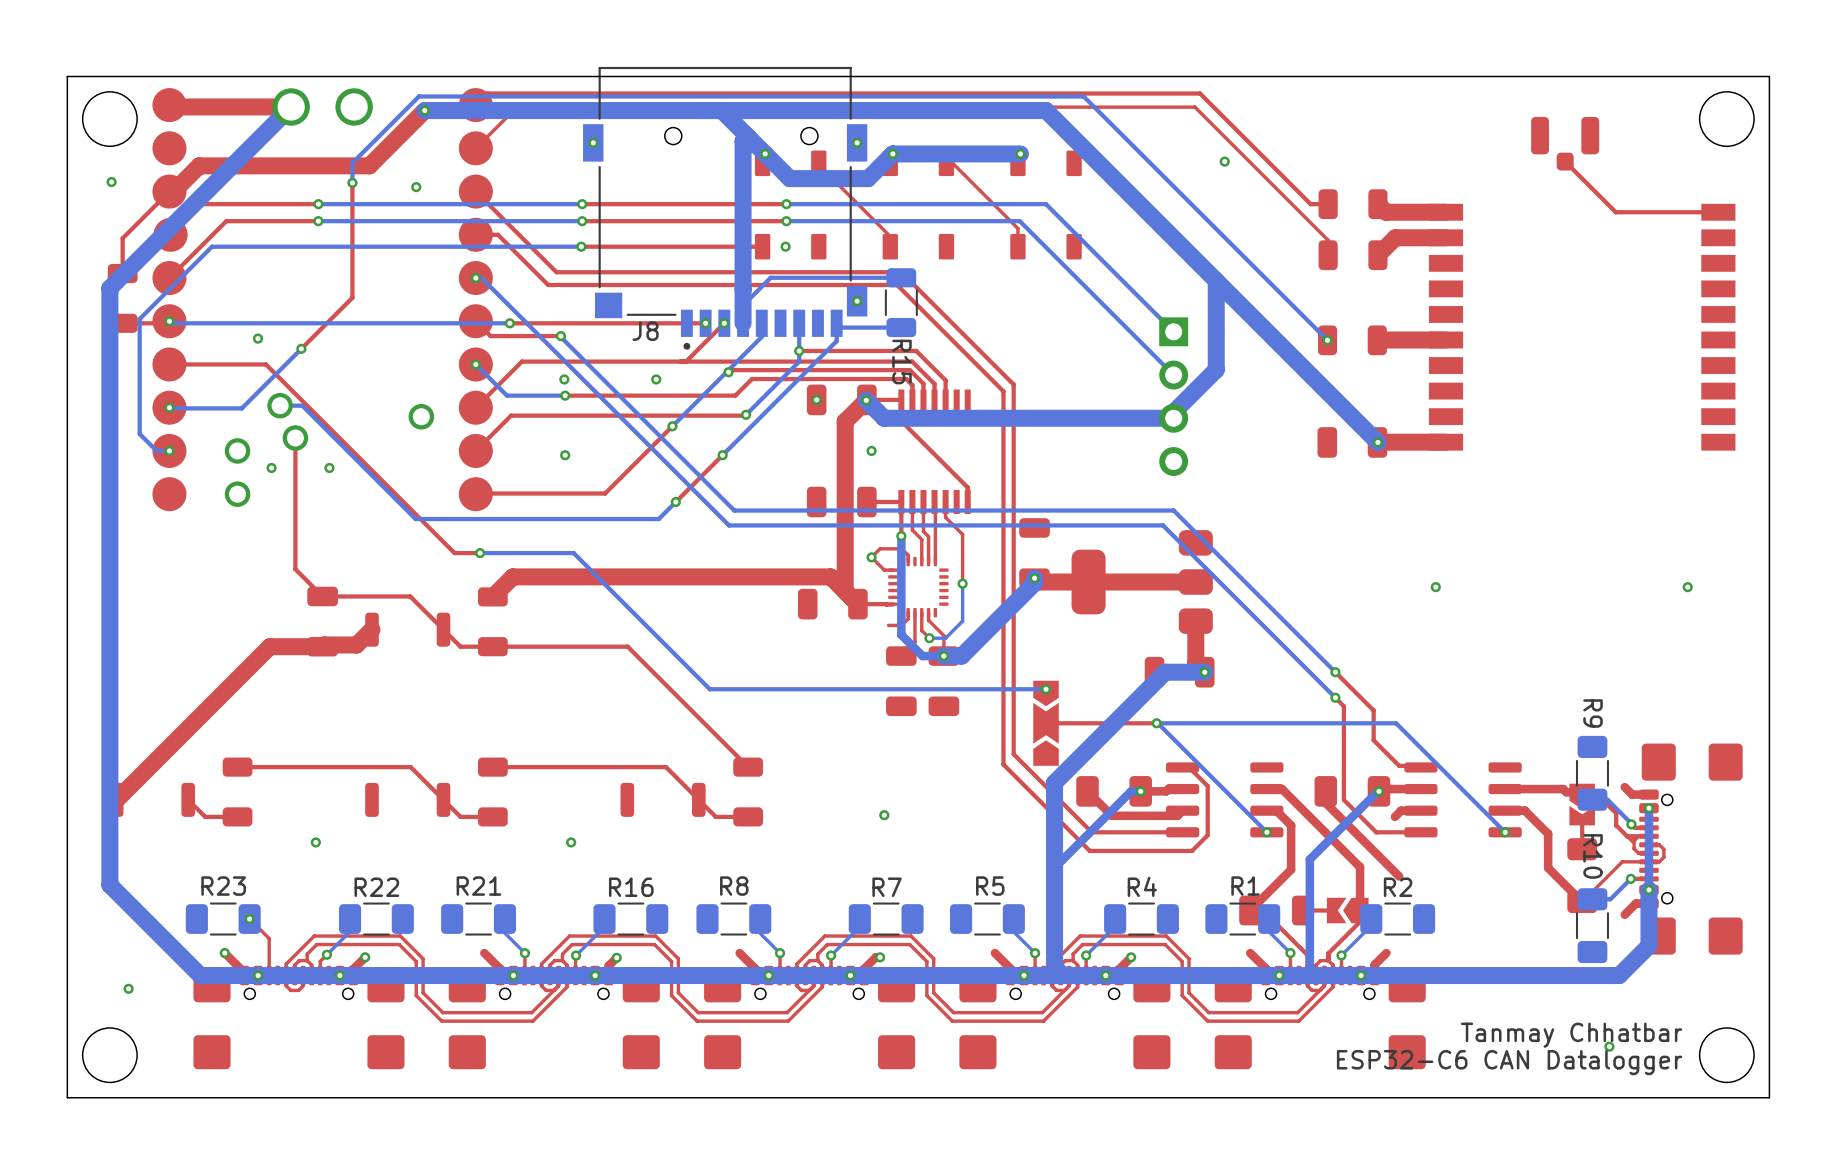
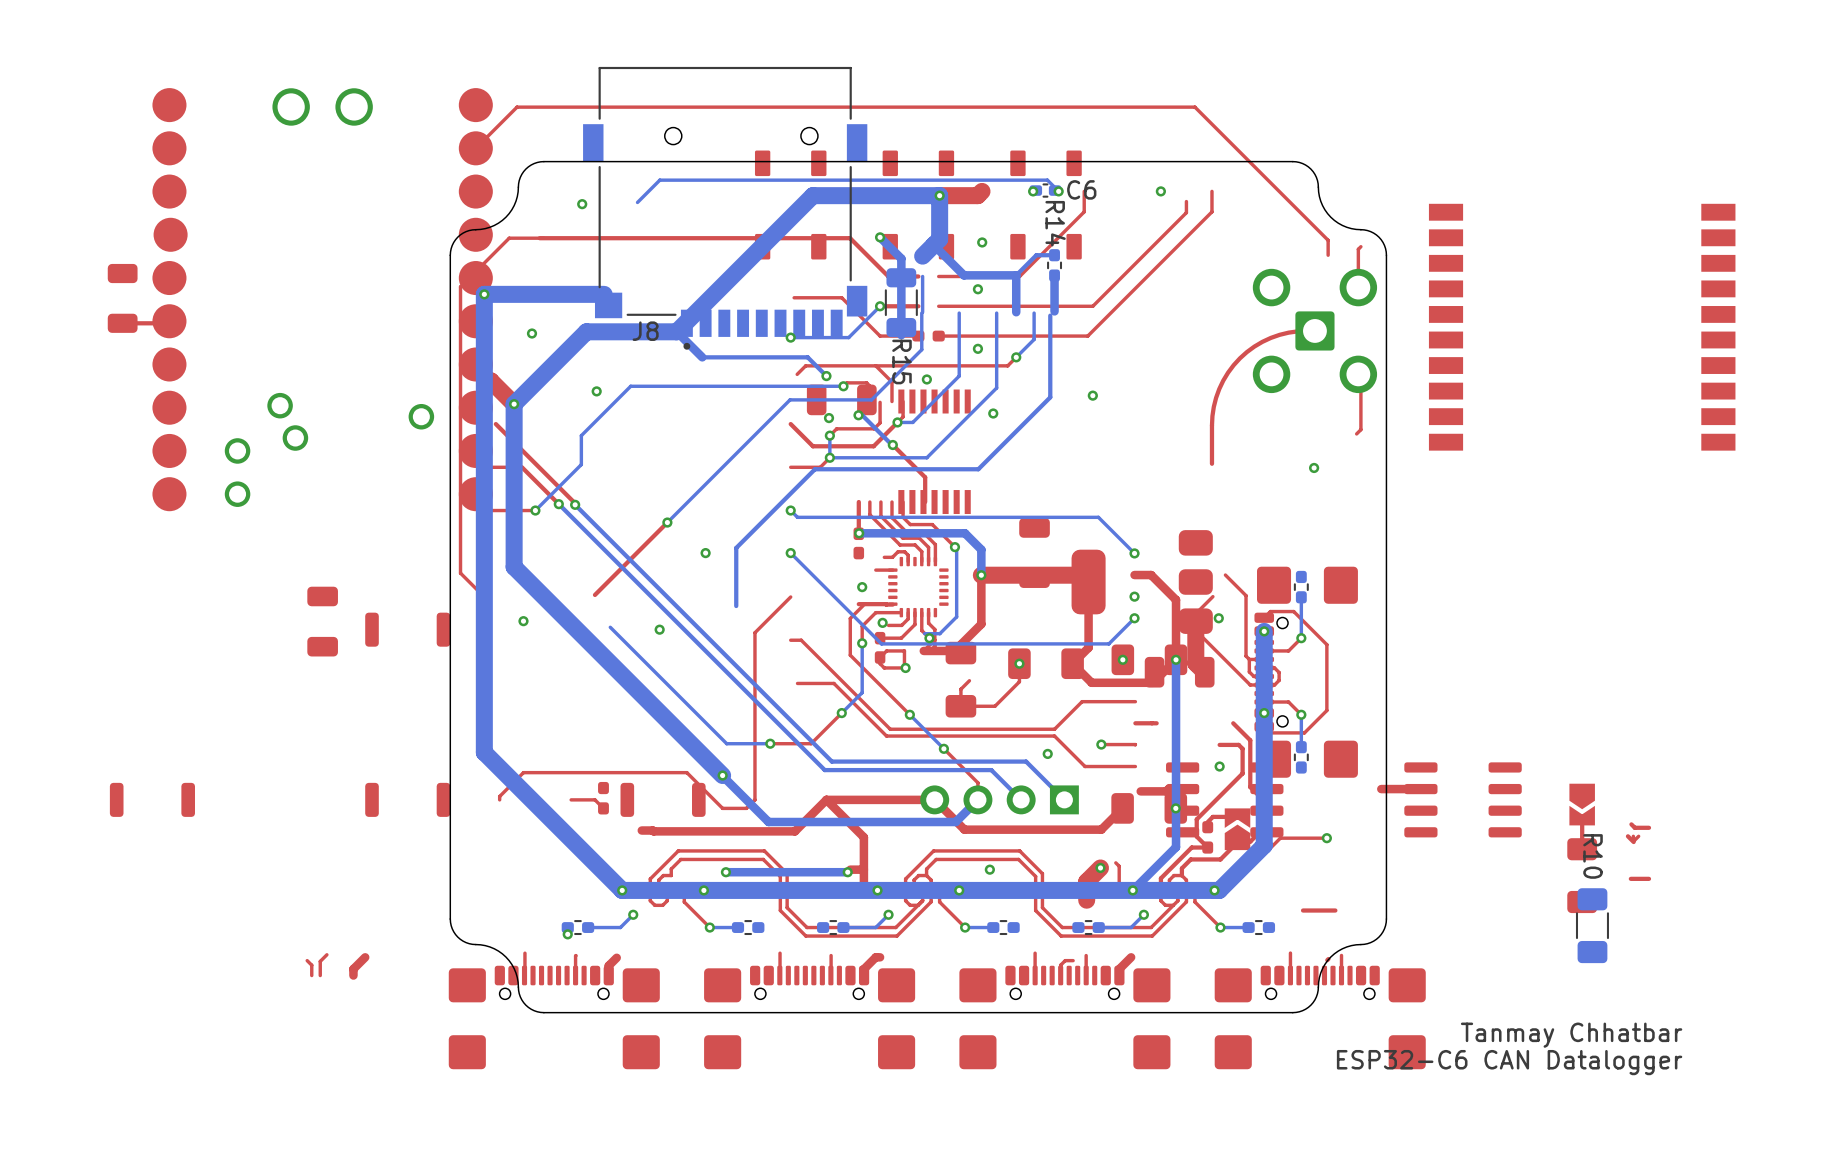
board edge: (1769, 76) (67, 76) (67, 1097) (1769, 1097) (1769, 76) -> none
round board edge: [82, 91, 138, 147] -> none
round board edge: [1699, 91, 1755, 147] -> none
top track: (475, 105) (487, 93) (1200, 93) (1310, 204) (1328, 204) -> none
top track: (291, 106) (171, 106) -> none
bottom track: (291, 106) (109, 288) (109, 884) (200, 975) (1619, 975) (1648, 945) (1648, 808) -> none
top track: (424, 110) (369, 165) (199, 165) (173, 191) -> none
bottom track: (424, 110) (1046, 110) (1377, 442) -> none
via: (424, 110) -> none
bottom track: (721, 110) (789, 178) (868, 178) (892, 153) (1020, 153) -> none
bottom track: (747, 136) (743, 141) (743, 323) (743, 293) -> none
via: (593, 142) -> none
via: (857, 142) -> none
part: (1565, 143) -> none
via: (765, 153) -> none
via: (892, 153) -> none
via: (1020, 153) -> none
via position: (1224, 161) -> (1160, 191)
board edge: none -> (1292, 161) (540, 161) (531, 165) (521, 174) (515, 201) (505, 217) (494, 225) (469, 230) (457, 237) (452, 245) (450, 255) (450, 922) (453, 931) (463, 941) (489, 946) (505, 957) (514, 968) (519, 993) (525, 1005) (534, 1010) (543, 1012) (1296, 1012) (1308, 1007) (1314, 999) (1320, 973) (1330, 957) (1342, 948) (1367, 943) (1378, 937) (1384, 928) (1386, 919) (1386, 251) (1381, 239) (1373, 233) (1346, 227) (1330, 217) (1320, 201) (1317, 180) (1313, 171) (1305, 165) (1292, 161)
top track: (1565, 161) (1615, 212) (1718, 212) -> none
top track: (946, 163) (952, 163) (1017, 228) (1017, 246) -> none
top track: (818, 165) (890, 236) -> none
via: (111, 182) -> none
top track: (352, 182) (352, 297) (301, 348) -> none
bottom track: (352, 182) (352, 163) (418, 96) (1083, 96) (1327, 340) -> none
via: (352, 182) -> none
via: (416, 187) -> none
C6: none -> (1045, 190)
top track: (169, 191) (122, 238) (122, 273) -> none
top track: (475, 191) (556, 272) (901, 272) (1013, 384) (1013, 754) (1091, 832) (1182, 832) -> none
top track: none -> (982, 191) (977, 195) (937, 195)
via: none -> (1033, 191)
bottom track: none -> (1058, 191) (1047, 180) (659, 180) (637, 202)
via: none -> (1058, 191)
top track: none -> (1084, 191) (1084, 211) (1019, 276) (938, 276)
top track: none -> (1211, 191) (1211, 211) (1087, 336) (938, 336)
via: none -> (939, 195)
top track: none -> (1186, 201) (1186, 212) (1092, 306) (938, 306)
top track: (318, 204) (201, 204) (170, 234) -> none
via: (318, 204) -> none
bottom track: (582, 204) (318, 204) -> none
top track: (786, 204) (582, 204) -> none
bottom track: (786, 204) (1046, 204) (1173, 331) -> none
via: (786, 204) -> none
part: (1353, 204) -> none
top track: (1377, 204) (1386, 212) (1446, 212) -> none
top track: (318, 221) (226, 221) (169, 278) -> none
via: (318, 221) -> none
bottom track: (582, 221) (318, 221) -> none
via: (582, 221) -> none
top track: (786, 221) (582, 221) -> none
bottom track: (786, 221) (1019, 221) (1173, 375) -> none
via: (786, 221) -> none
top track: (475, 234) (497, 234) (548, 285) (897, 285) (1003, 391) (1003, 764) (1089, 850) (1192, 850) (1207, 835) (1207, 786) (1189, 767) -> none
bottom track: none -> (880, 237) (901, 258) (901, 335)
via: none -> (880, 237)
top track: (1446, 237) (1395, 237) (1377, 255) -> none
top track: none -> (539, 238) (850, 238) (888, 276) (918, 276)
top track: none -> (543, 238) (509, 238) (460, 286) (460, 573) (484, 596)
via: none -> (982, 242)
bottom track: none -> (933, 245) (964, 275) (1016, 275)
bottom track: (581, 246) (212, 246) (139, 319) (139, 433) (156, 450) (169, 450) -> none
via: (581, 246) -> none
top track: (762, 246) (581, 246) -> none
via: (785, 246) -> none
top track: none -> (1360, 246) (1358, 249) (1358, 287)
bottom track: none -> (1054, 255) (1036, 255) (1016, 275)
part: (1353, 255) -> none
bottom track: none -> (922, 256) (939, 239) (939, 195) (812, 195) (676, 331)
R14: none -> (1054, 265)
bottom track: none -> (1016, 275) (1016, 312)
bottom track: none -> (1054, 275) (1054, 311)
bottom track: none -> (922, 276) (922, 312)
bottom track: (901, 277) (770, 277) (743, 305) -> none
bottom track: (475, 278) (481, 278) (729, 525) (1163, 525) (1335, 697) -> none
via position: (475, 278) -> (484, 294)
bottom track: (1216, 280) (1216, 369) (1173, 412) -> none
via: none -> (977, 289)
bottom track: none -> (604, 294) (484, 294) (484, 752) (622, 890) (1219, 890) (1264, 845) (1264, 631)
top track: none -> (794, 297) (841, 297) (880, 336) (914, 336)
via position: (857, 301) -> (880, 306)
bottom track: none -> (880, 306) (848, 337) (790, 337)
top track: none -> (918, 306) (880, 306)
bottom track: none -> (921, 313) (921, 349) (871, 399) (790, 399) (667, 522)
bottom track: none -> (959, 313) (959, 376) (912, 422) (897, 422)
bottom track: none -> (996, 313) (996, 387) (926, 457) (829, 457) (829, 435)
bottom track: none -> (1034, 313) (1034, 339) (1016, 357)
bottom track: none -> (1050, 315) (1050, 397) (978, 469) (814, 469) (736, 547) (736, 606)
bottom track: (169, 321) (173, 323) (509, 323) -> none
via: (169, 321) -> none
top track: (475, 321) (490, 336) (560, 336) -> none
via: (509, 323) -> none
top track: (705, 323) (509, 323) -> none
via: (705, 323) -> none
top track: (724, 323) (686, 361) -> none
via: (724, 323) -> none
bottom track: (761, 323) (761, 336) (728, 372) (672, 426) -> none
bottom track: (799, 323) (799, 361) (746, 414) -> none
bottom track: (901, 327) (840, 327) (836, 323) (836, 341) (722, 455) -> none
top track: none -> (1307, 330) (1288, 332) (1262, 341) (1239, 358) (1228, 372) (1219, 389) (1213, 406) (1211, 463)
part: none -> (1314, 330)
bottom track: none -> (676, 331) (702, 357) (807, 357) (826, 376)
bottom track: none -> (676, 331) (586, 331) (514, 404) (514, 567) (768, 822) (955, 822) (977, 799)
via: none -> (532, 333)
bottom track: (560, 336) (734, 510) (1173, 510) (1335, 672) -> none
via: (560, 336) -> none
part: none -> (928, 336)
via: (257, 338) -> none
top track: (1446, 339) (1377, 339) -> none
via: (1327, 340) -> none
part: (1352, 340) -> none
bottom track: (301, 348) (241, 408) (169, 407) -> none
via: (301, 348) -> none
via: none -> (977, 348)
top track: (799, 350) (916, 350) (945, 380) (945, 401) -> none
via position: (799, 350) -> (790, 337)
top track: none -> (1016, 357) (1007, 365) (805, 365) (797, 374)
via: none -> (1016, 357)
top track: (169, 364) (265, 364) (454, 553) (480, 553) -> none
bottom track: (475, 364) (506, 395) (565, 395) -> none
via: (475, 364) -> none
top track: none -> (875, 365) (891, 382) (891, 401)
top track: (728, 372) (730, 370) (909, 370) (923, 383) (923, 401) -> none
via: (728, 372) -> none
top track: none -> (1358, 374) (1360, 374) (1360, 429) (1356, 433)
via: none -> (826, 376)
via: (564, 379) -> none
via: (656, 379) -> none
via: none -> (926, 379)
top track: none -> (484, 380) (490, 380) (514, 404)
top track: none -> (843, 386) (846, 382) (866, 382) (869, 386) (869, 401)
bottom track: none -> (843, 386) (630, 386) (581, 435) (581, 464) (535, 510)
via: none -> (843, 386)
via: none -> (596, 391)
top track: (565, 395) (735, 395) (751, 379) (906, 379) (912, 385) (912, 401) -> none
via: (565, 395) -> none
via: none -> (1092, 395)
part: (1173, 396) -> none
via: (816, 399) -> none
bottom track: (866, 400) (884, 418) (1173, 418) -> none
via: (866, 400) -> none
top track: none -> (903, 401) (903, 416) (873, 446) (812, 446) (790, 424)
top track: (934, 401) (934, 383) (912, 361) (521, 361) (475, 407) -> none
top track: none -> (880, 402) (880, 422) (874, 428) (836, 428) (829, 435)
via: none -> (514, 404)
bottom track: (280, 405) (302, 405) (415, 519) (658, 519) (675, 502) -> none
via: (169, 407) -> none
via: none -> (993, 413)
top track: (746, 414) (511, 415) (475, 450) -> none
via: (746, 414) -> none
bottom track: none -> (858, 415) (862, 415) (892, 445)
via: none -> (858, 415)
via: none -> (829, 418)
via: none -> (897, 422)
top track: none -> (495, 424) (575, 503)
top track: (672, 426) (605, 493) (476, 493) -> none
via: (672, 426) -> none
via: none -> (829, 435)
top track: (295, 438) (295, 569) (322, 596) (410, 596) (460, 646) (627, 646) (748, 767) -> none
part: (1352, 442) -> none
via: (1377, 442) -> none
top track: (1446, 442) (1377, 442) -> none
top track: none -> (892, 445) (925, 477) (925, 502)
via: none -> (892, 445)
via: (169, 450) -> none
via: (871, 450) -> none
via: (565, 455) -> none
top track: (722, 455) (675, 502) -> none
via: (722, 455) -> none
top track: none -> (829, 457) (820, 467) (790, 467)
via: none -> (829, 457)
via: (271, 467) -> none
via: (329, 467) -> none
top track: none -> (484, 467) (521, 467) (558, 504)
via: none -> (1314, 467)
via position: (675, 502) -> (667, 522)
part: (841, 502) -> none
top track: none -> (858, 502) (858, 533)
top track: (866, 502) (901, 502) (901, 536) -> none
top track: none -> (903, 502) (903, 517) (910, 524) (932, 524) (954, 547)
top track: (912, 502) (912, 530) (921, 539) (921, 551) -> (869, 502) (869, 514) (900, 544) (915, 544) (921, 551)
top track: (923, 502) (923, 531) (928, 536) (928, 547) -> (880, 502) (880, 516) (902, 538) (919, 538) (928, 547)
top track: (935, 502) (935, 544) -> (891, 502) (891, 517) (905, 531) (922, 531) (935, 544)
top track: (945, 502) (945, 517) (962, 534) (962, 583) -> none
top track: (967, 502) (967, 487) (901, 421) (901, 401) (899, 399) (866, 399) (845, 421) (845, 591) -> none
bottom track: none -> (558, 504) (824, 770) (991, 770) (1021, 799)
via: none -> (558, 504)
bottom track: none -> (575, 504) (831, 761) (1026, 761) (1064, 799)
via: none -> (575, 504)
top track: none -> (535, 510) (484, 510)
via: none -> (535, 510)
bottom track: none -> (790, 510) (797, 517) (1098, 517) (1134, 553)
via: none -> (790, 510)
top track: none -> (667, 522) (594, 594)
bottom track: none -> (859, 533) (964, 533) (981, 549) (981, 575)
via: none -> (859, 533)
bottom track: (901, 536) (901, 634) (922, 656) (961, 656) (1034, 583) (1034, 578) -> none
via: (901, 536) -> none
part: none -> (858, 543)
bottom track: none -> (954, 547) (956, 548) (956, 616) (939, 633) (924, 633)
via: none -> (954, 547)
top track: (904, 551) (901, 548) (880, 548) (871, 557) (884, 570) -> (904, 551) (898, 551) (892, 557) (884, 557)
bottom track: (480, 553) (573, 553) (709, 689) (1046, 689) -> none
via: (480, 553) -> none
via: none -> (705, 553)
bottom track: none -> (790, 553) (881, 643) (1108, 643) (1134, 618)
via: none -> (790, 553)
via: none -> (1134, 553)
via: (871, 557) -> none
top track: none -> (884, 570) (875, 570)
via: none -> (981, 575)
top track: none -> (1088, 575) (981, 575) (981, 624) (960, 644) (960, 653) (958, 650) (923, 650) (934, 639)
top track: none -> (1134, 575) (1151, 575) (1176, 599) (1176, 659) (1153, 682) (1091, 682) (1072, 663) (1088, 647) (1088, 614)
top track: none -> (1225, 575) (1246, 595) (1246, 656) (1249, 659) (1264, 659)
top track: (1034, 578) (1038, 582) (1195, 582) -> none
via: (1034, 578) -> none
bottom track: (962, 583) (962, 621) (945, 638) (929, 638) -> none
via: (962, 583) -> none
via: none -> (862, 587)
part: none -> (1301, 587)
via: (1435, 587) -> none
via: (1687, 587) -> none
top track: (492, 596) (512, 576) (830, 576) (857, 604) -> none
top track: none -> (790, 596) (754, 632) (754, 799) (746, 808) (722, 808) (686, 772) (523, 772) (499, 796) (499, 799)
via: none -> (1134, 596)
top track: none -> (1212, 596) (1197, 612) (1197, 631) (1250, 684) (1274, 684) (1279, 680) (1279, 672) (1274, 667) (1264, 667)
bottom track: none -> (1301, 597) (1301, 638)
part: (832, 604) -> none
top track: none -> (863, 605) (850, 618) (850, 655) (909, 714)
top track: none -> (901, 612) (875, 612) (862, 626) (862, 643)
top track: none -> (1264, 617) (1270, 611) (1293, 611) (1326, 644) (1326, 710) (1304, 732) (1270, 732) (1264, 726)
via: none -> (1134, 618)
via: none -> (1218, 618)
top track: (928, 620) (943, 635) (943, 656) -> (928, 620) (928, 623) (934, 629) (934, 646) (931, 649)
part: (492, 621) -> none
via: none -> (523, 621)
via: none -> (882, 622)
top track: (914, 624) (914, 642) (901, 656) -> (914, 624) (901, 638) (880, 638)
bottom track: none -> (610, 627) (726, 743) (770, 743)
top track: (372, 629) (356, 644) (269, 646) (116, 799) -> none
via: none -> (659, 629)
via: none -> (1264, 631)
top track: none -> (1301, 638) (1288, 650) (1264, 650)
via: none -> (1301, 638)
top track: none -> (790, 640) (801, 640) (890, 729) (1054, 729) (1082, 701) (1135, 701)
bottom track: none -> (862, 643) (862, 692) (841, 713)
via: none -> (862, 643)
part: none -> (880, 647)
top track: none -> (904, 650) (886, 650) (880, 657) (880, 663) (884, 667) (905, 667) (904, 650)
via: (943, 656) -> none
via: none -> (1122, 659)
part: none -> (1149, 659)
bottom track: none -> (1176, 659) (1176, 847) (1132, 890)
via: none -> (1176, 659)
top track: none -> (1249, 659) (1249, 671) (1253, 676) (1264, 676)
top track: none -> (1019, 663) (1019, 681) (994, 706) (960, 706) (960, 689) (969, 680)
via: none -> (1019, 663)
part: none -> (1046, 663)
via: none -> (905, 667)
bottom track: (1204, 672) (1165, 672) (1054, 782) (1054, 967) (1063, 975) -> none
via: (1204, 672) -> none
top track: (1335, 672) (1373, 710) (1373, 740) (1399, 765) (1419, 765) -> none
via: (1335, 672) -> none
part: none -> (960, 679)
part: (901, 681) -> none
part: (943, 681) -> none
top track: none -> (797, 683) (833, 683) (886, 736) (1054, 736) (1085, 766) (1135, 766)
via: (1046, 689) -> none
top track: (1335, 697) (1343, 706) (1343, 799) (1376, 832) (1420, 832) -> none
via: (1335, 697) -> none
top track: none -> (1264, 702) (1288, 702) (1301, 714)
top track: none -> (841, 713) (811, 743) (770, 743)
via: none -> (841, 713)
via: none -> (1264, 713)
bottom track: none -> (909, 714) (943, 748)
via: none -> (909, 714)
bottom track: none -> (1301, 714) (1301, 747)
via: none -> (1301, 714)
part: (1046, 723) -> none
top track: (1135, 723) (1046, 723) -> none
bottom track: (1156, 723) (1396, 723) (1505, 832) -> none
via: (1156, 723) -> none
bottom track: (1157, 723) (1266, 832) -> none
top track: none -> (1233, 723) (1250, 740) (1250, 787) (1258, 795) (1258, 833) (1250, 841) (1237, 841)
via: none -> (770, 743)
via: none -> (1101, 744)
top track: none -> (1135, 744) (1101, 744)
top track: none -> (1219, 744) (1238, 744) (1242, 748) (1242, 773) (1196, 819) (1196, 836) (1207, 847) (1191, 847) (1160, 878) (1160, 900) (1165, 905) (1173, 905)
top track: none -> (943, 748) (977, 782) (977, 799)
via: none -> (943, 748)
via: none -> (1047, 753)
part: none -> (1301, 757)
via: none -> (1219, 766)
top track: (237, 767) (410, 767) (460, 816) (492, 816) -> none
top track: (492, 767) (666, 767) (715, 816) (748, 816) -> none
R9: (1592, 773) -> none
via: none -> (722, 775)
top track: (1624, 787) (1632, 794) (1648, 794) -> none
top track: (1266, 789) (1282, 789) (1360, 867) (1360, 921) (1328, 953) (1328, 960) -> none
top track: (1505, 789) (1563, 789) (1566, 792) (1595, 792) (1616, 813) (1616, 825) (1627, 836) (1648, 836) -> none
top track: (1087, 791) (1111, 815) (1177, 815) (1182, 810) -> none
part position: (1114, 791) -> (1149, 808)
bottom track: (1140, 791) (1131, 791) (1055, 866) -> none
via: (1140, 791) -> none
top track: (1325, 791) (1325, 803) (1399, 876) -> none
part: (1352, 791) -> none
bottom track: (1378, 791) (1309, 859) (1309, 975) -> none
via: (1378, 791) -> none
part: (237, 792) -> none
part: (492, 792) -> none
part: (748, 792) -> none
part: none -> (603, 798)
top track: (188, 799) (205, 816) (237, 816) -> none
top track: none -> (571, 799) (594, 799) (603, 808)
top track: none -> (826, 799) (794, 831) (641, 830)
top track: none -> (826, 799) (934, 799) (964, 829) (1101, 829) (1122, 808)
top track: none -> (826, 799) (863, 837) (863, 890)
part: none -> (999, 799)
bottom track: (1592, 799) (1607, 799) (1631, 824) -> none
via: none -> (1175, 808)
via: (1648, 808) -> none
top track: (1276, 810) (1291, 825) (1291, 869) (1250, 910) (1262, 910) (1307, 955) (1307, 985) (1312, 990) (1319, 990) -> none
top track: (1420, 810) (1401, 810) (1394, 816) -> none
top track: (1505, 810) (1524, 810) (1548, 833) (1548, 867) (1582, 902) (1622, 861) (1659, 861) (1663, 857) (1663, 849) (1659, 844) (1648, 844) -> none
via: (884, 815) -> none
top track: none -> (1237, 816) (1212, 816) (1207, 822)
via: (1631, 824) -> none
via: (1266, 832) -> none
via: (1505, 832) -> none
part: none -> (1207, 837)
top track: none -> (1326, 838) (1280, 838) (1228, 890)
via: none -> (1326, 838)
top track: (1634, 840) (1634, 848) (1638, 853) (1648, 853) -> none
via: (315, 842) -> none
via: (571, 842) -> none
top track: none -> (1237, 842) (1220, 859) (1190, 859) (1181, 868) (1181, 875)
part position: (1690, 849) -> (1306, 672)
top track: none -> (1115, 862) (1119, 866) (1119, 890)
top track: none -> (1100, 867) (1086, 881) (1086, 900)
via: none -> (1100, 867)
top track: none -> (863, 869) (850, 869)
via: none -> (989, 869)
via: none -> (725, 872)
bottom track: none -> (847, 872) (725, 872)
via: none -> (847, 872)
bottom track: (1630, 878) (1610, 899) (1592, 899) -> none
via: (1630, 878) -> none
via: (1648, 889) -> none
via: none -> (622, 890)
top track: none -> (684, 890) (684, 902) (709, 927)
via: none -> (703, 890)
via: none -> (877, 890)
top track: none -> (939, 890) (939, 902) (965, 927)
via: none -> (959, 890)
via: none -> (1132, 890)
top track: none -> (1194, 890) (1194, 902) (1220, 927)
via: none -> (1214, 890)
top track: (1648, 903) (1635, 903) (1624, 914) -> none
part: (1276, 910) -> none
part rotation: 0° (1347, 910) -> 90° clockwise (1237, 829)
part position: (1347, 910) -> (1237, 829)
bottom track: none -> (633, 914) (620, 927) (588, 927)
via: none -> (633, 914)
bottom track: none -> (888, 914) (875, 927) (843, 927)
via: none -> (888, 914)
bottom track: none -> (1143, 914) (1131, 927) (1098, 927)
via: none -> (1143, 914)
R23: (223, 919) -> none
top track: (249, 919) (269, 938) (269, 975) -> none
via: (249, 919) -> none
R22: (376, 919) -> none
R21: (478, 919) -> none
R16: (630, 919) -> none
R8: (733, 919) -> none
R7: (886, 919) -> none
R5: (987, 919) -> none
R4: (1141, 919) -> none
R1: (1242, 919) -> none
R2: (1397, 919) -> none
bottom track: (605, 925) (576, 955) -> none
bottom track: (860, 925) (831, 955) -> none
bottom track: (1115, 925) (1086, 955) -> none
bottom track: (1371, 925) (1341, 955) -> none
part: none -> (577, 927)
via: none -> (709, 927)
bottom track: none -> (737, 927) (709, 927)
part: none -> (748, 927)
part: none -> (833, 927)
via: none -> (965, 927)
bottom track: none -> (993, 927) (965, 927)
part: none -> (1003, 927)
part: none -> (1088, 927)
via: none -> (1220, 927)
bottom track: none -> (1248, 927) (1220, 927)
part: none -> (1258, 927)
bottom track: (350, 931) (326, 954) -> none
bottom track: (503, 931) (524, 953) -> none
bottom track: (758, 931) (780, 953) -> none
bottom track: (1013, 931) (1035, 953) -> none
bottom track: (1269, 931) (1290, 953) -> none
top track: (824, 936) (796, 964) (796, 985) (801, 990) (809, 990) -> (824, 936) (805, 936) (780, 910) (780, 876) (763, 859) (680, 859) (671, 869) (671, 875) (663, 875) (658, 880) (658, 890)
top track: (896, 936) (910, 936) (933, 958) (933, 992) (953, 1012) (1042, 1012) (1069, 985) (1069, 975) -> (896, 936) (931, 901) (931, 880) (926, 875)
top track: (1080, 936) (1052, 964) (1052, 985) (1056, 990) (1064, 990) -> (1080, 936) (1061, 936) (1035, 910) (1035, 876) (1018, 859) (936, 859) (926, 869) (926, 875)
top track: (1152, 936) (1166, 936) (1189, 958) (1189, 992) (1208, 1012) (1297, 1012) (1324, 985) (1324, 975) -> (1152, 936) (1186, 901) (1186, 880) (1181, 875)
top track: (224, 953) (244, 972) -> none
via: (224, 953) -> none
top track: (484, 953) (499, 968) (499, 975) -> none
via: (524, 953) -> none
top track: (739, 953) (755, 968) (755, 975) -> none
via: (780, 953) -> none
top track: (994, 953) (1010, 968) (1010, 975) -> none
via: (1035, 953) -> none
top track: (1250, 953) (1265, 968) (1265, 975) -> none
via: (1290, 953) -> none
top track: (1386, 953) (1374, 964) (1374, 975) -> none
via: (326, 954) -> none
via position: (576, 955) -> (567, 934)
via: (831, 955) -> none
via: (1086, 955) -> none
via: (1341, 955) -> none
via: (365, 957) -> none
via: (616, 957) -> none
via: (880, 957) -> none
via: (1131, 957) -> none
top track: (562, 960) (554, 960) (550, 965) (550, 975) -> (926, 875) (918, 875) (914, 880) (914, 890)
top track: (562, 960) (567, 965) (567, 986) (532, 1021) (441, 1021) (416, 995) (416, 961) (399, 944) (316, 944) (307, 954) (307, 960) (299, 960) (294, 965) (294, 975) -> none
top track: (817, 960) (809, 960) (805, 965) (805, 975) -> (1181, 875) (1173, 875) (1169, 880) (1169, 890)
top track: (817, 960) (822, 965) (822, 986) (788, 1021) (697, 1021) (671, 995) (671, 961) (654, 944) (572, 944) (562, 954) (562, 960) -> none
top track: (1328, 960) (1320, 960) (1315, 965) (1315, 975) -> none
top track: (1328, 960) (1332, 965) (1332, 986) (1298, 1021) (1207, 1021) (1182, 995) (1182, 961) (1165, 944) (1082, 944) (1073, 954) (1073, 960) (1077, 965) (1077, 986) (1043, 1021) (952, 1021) (926, 995) (926, 961) (909, 944) (827, 944) (817, 954) (817, 960) -> none
via: (258, 975) -> none
via: (339, 975) -> none
via: (513, 975) -> none
top track: (558, 975) (558, 985) (531, 1012) (442, 1012) (423, 992) (423, 958) (400, 936) (314, 936) (286, 964) (286, 985) (290, 990) (298, 990) (303, 985) (303, 975) -> (922, 890) (922, 900) (895, 927) (806, 927) (787, 907) (787, 873) (764, 850) (678, 850) (650, 878) (650, 900) (654, 905) (662, 905) (667, 900) (667, 890)
via: (595, 975) -> none
via: (768, 975) -> none
top track: (813, 975) (813, 985) (787, 1012) (698, 1012) (678, 992) (678, 958) (655, 936) (569, 936) (541, 964) (541, 985) (546, 990) (554, 990) -> (1177, 890) (1177, 900) (1151, 927) (1062, 927) (1042, 907) (1042, 873) (1019, 850) (933, 850) (905, 878) (905, 900) (910, 905) (918, 905)
via: (850, 975) -> none
via: (1024, 975) -> none
via: (1105, 975) -> none
via: (1279, 975) -> none
via: (1361, 975) -> none
via: (128, 988) -> none
part: (298, 1017) -> none
round board edge: [82, 1027, 138, 1083] -> none
round board edge: [1699, 1027, 1755, 1083] -> none
via: (1609, 1046) -> none

